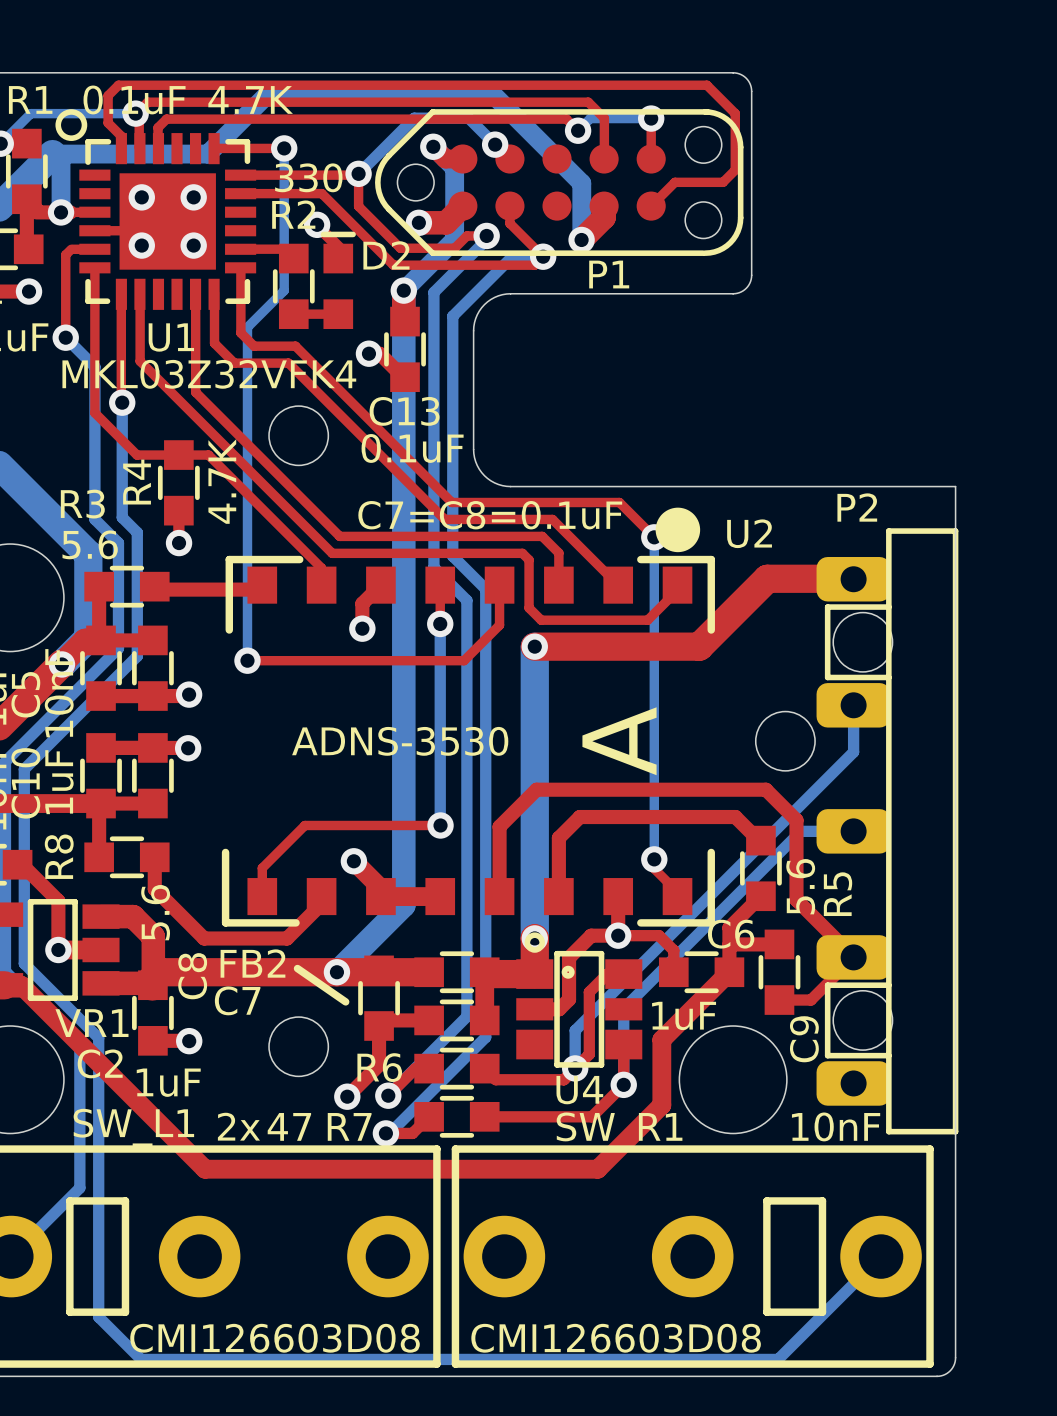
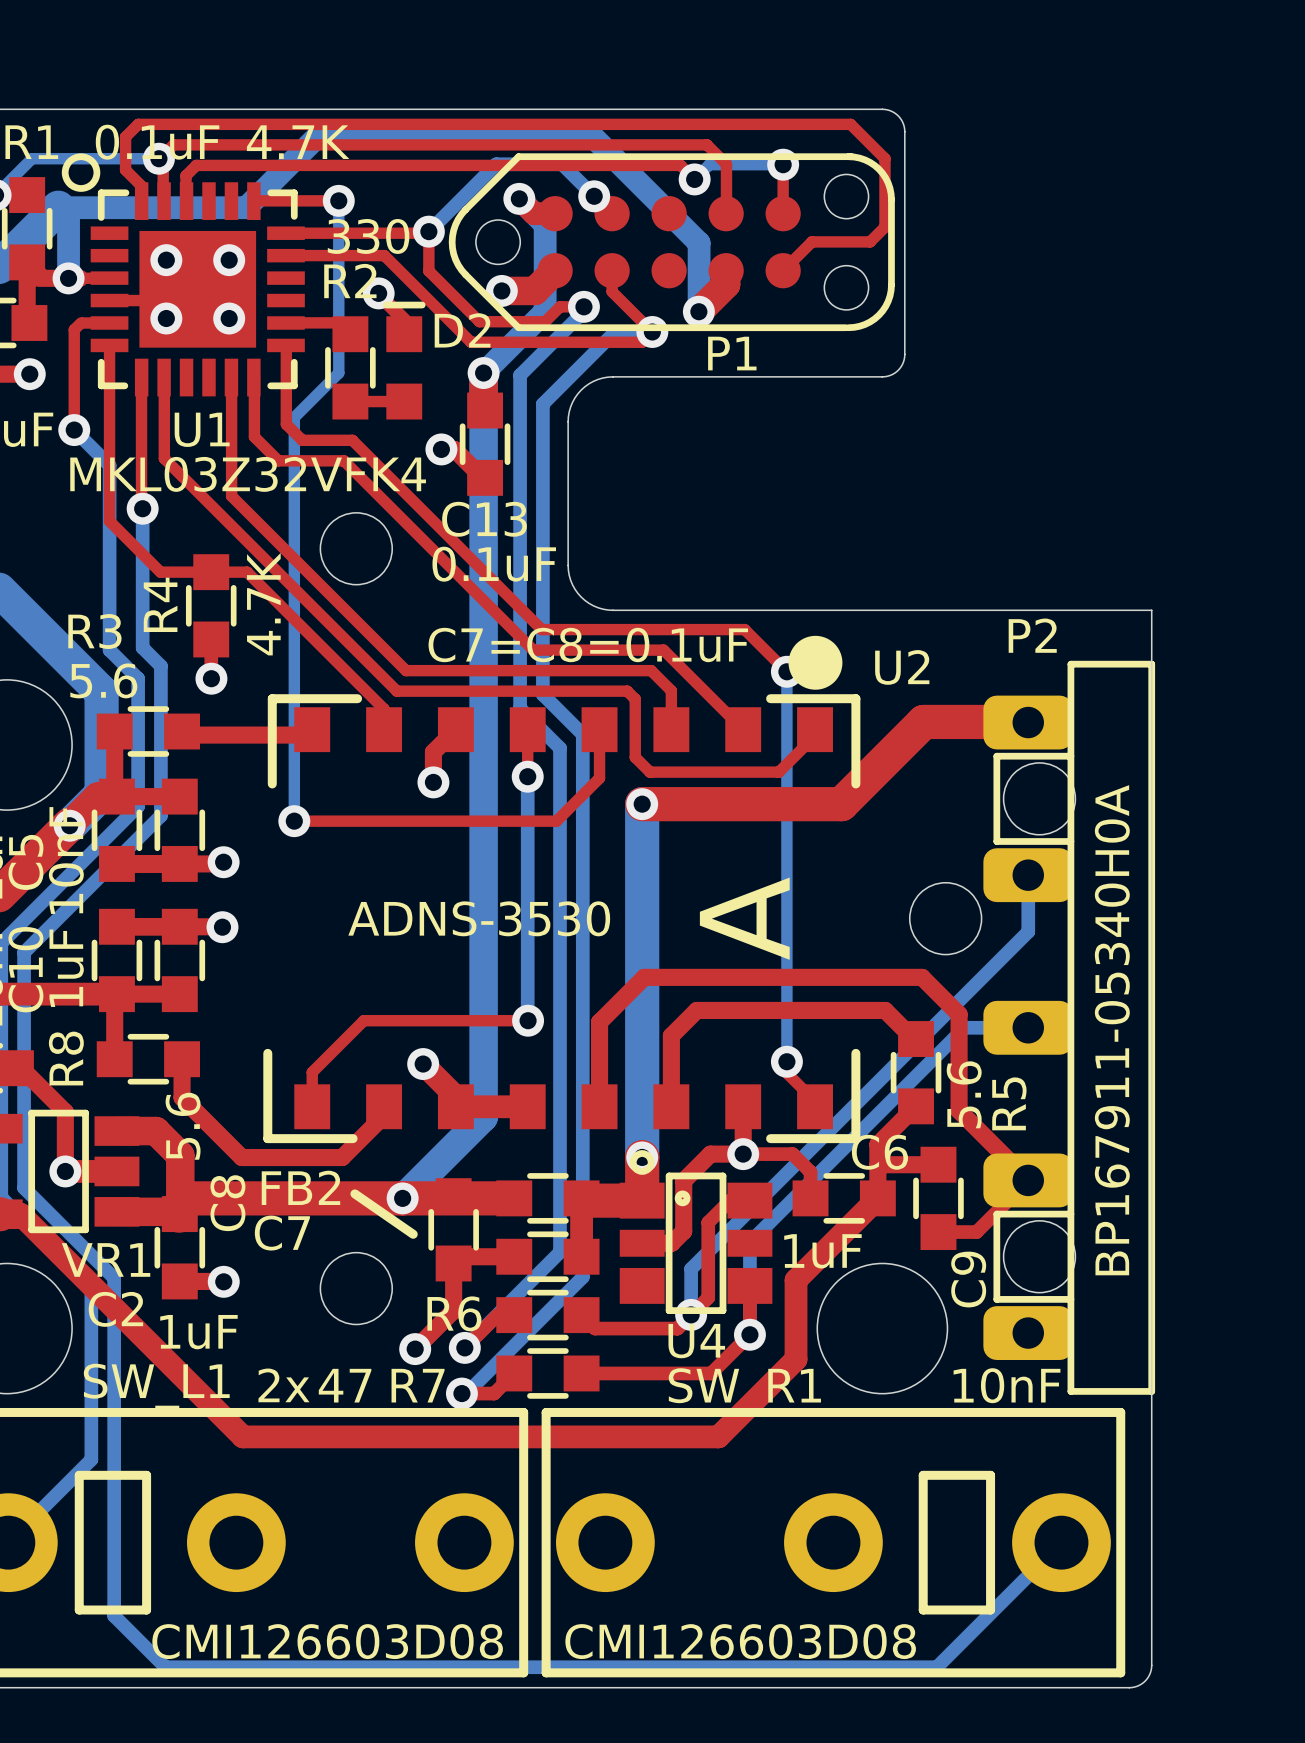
text: none -> BP167911-05340H0A (1112, 1030)

